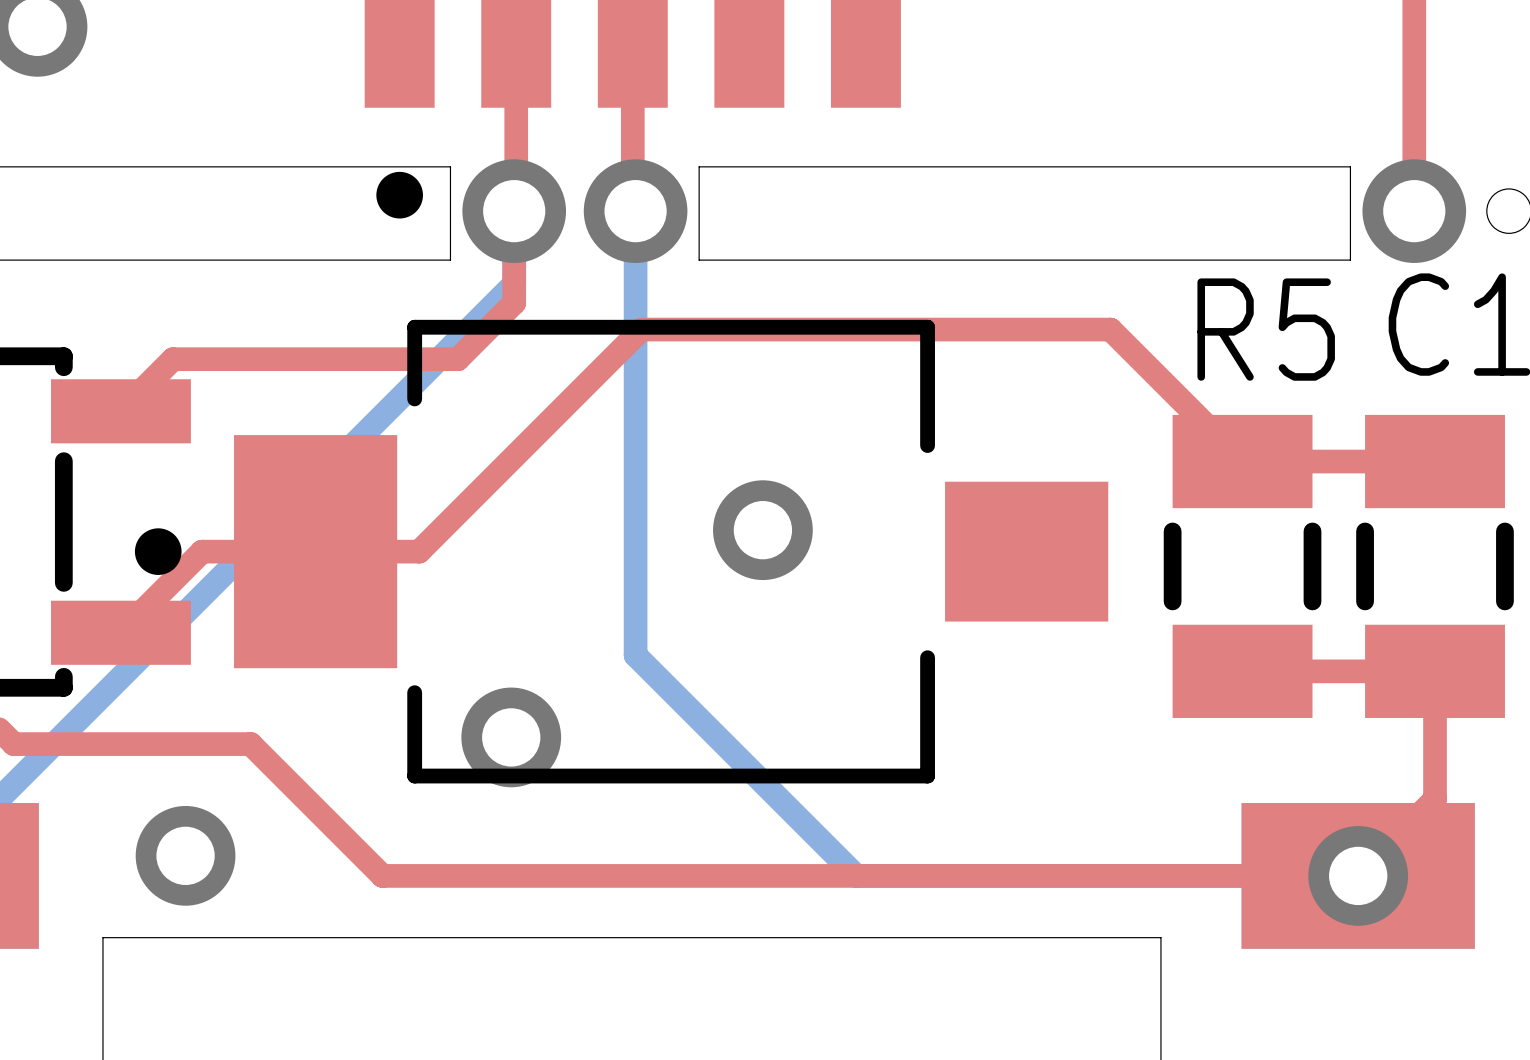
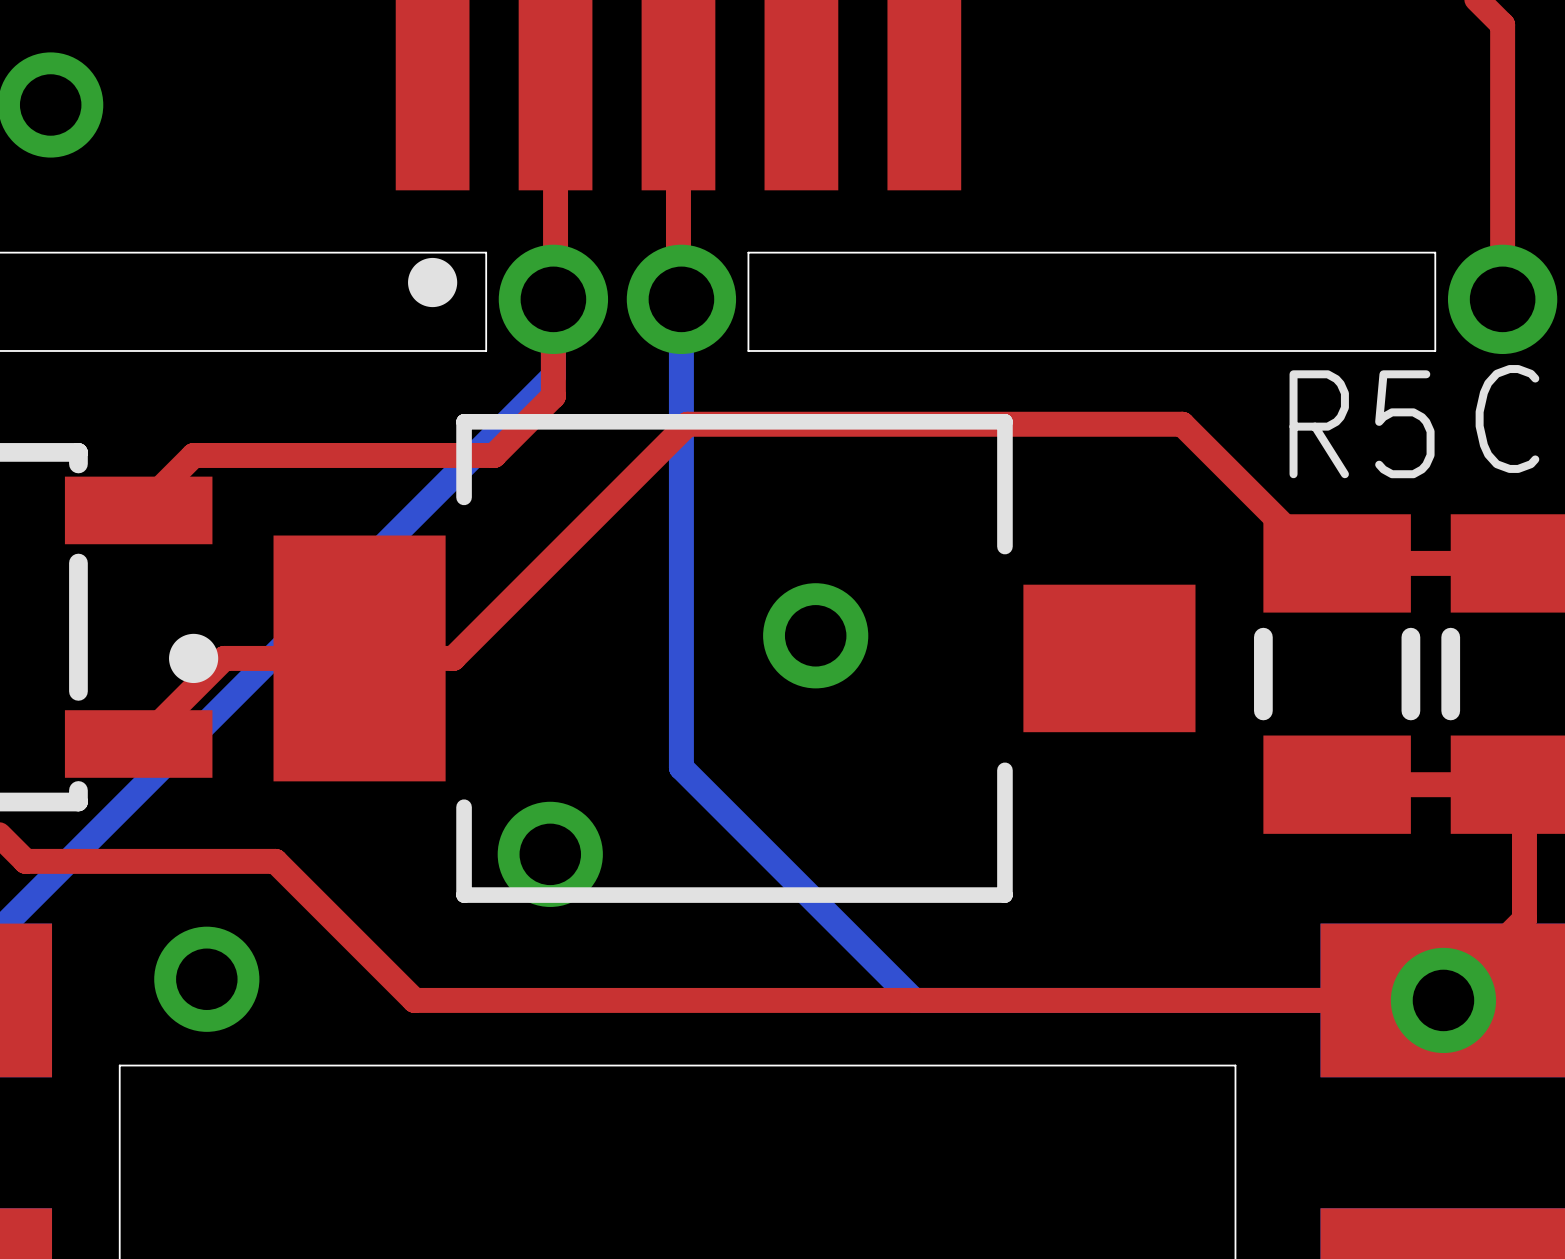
part position: (621, 551) -> (682, 658)
R5 position: (1242, 566) -> (1337, 674)

